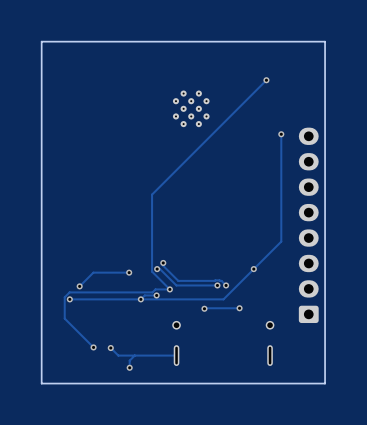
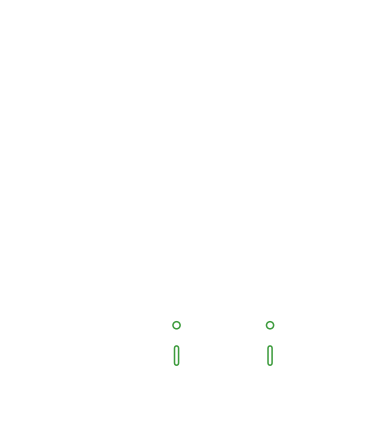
board edge: (325, 41) (41, 41) (41, 383) (325, 383) (325, 41) -> none
track: (266, 80) (152, 194) (152, 271) (169, 289) (155, 289) (152, 292) (69, 292) (64, 297) (64, 318) (93, 347) -> none
via: (266, 80) -> none
part: (191, 108) -> none
track: (281, 134) (281, 241) (223, 299) (69, 299) -> none
via: (281, 134) -> none
part: (308, 225) -> none
track: (163, 262) (163, 265) (178, 280) (219, 280) (226, 285) -> none
via: (163, 262) -> none
track: (157, 269) (160, 269) (176, 285) (217, 285) -> none
via: (157, 269) -> none
via: (253, 269) -> none
track: (129, 272) (93, 272) (79, 286) -> none
via: (129, 272) -> none
via: (217, 285) -> none
via: (226, 285) -> none
via: (79, 286) -> none
via: (169, 289) -> none
track: (156, 295) (144, 295) (140, 299) -> none
via: (156, 295) -> none
via: (69, 299) -> none
via: (140, 299) -> none
via: (204, 308) -> none
track: (239, 308) (204, 308) -> none
via: (239, 308) -> none
via: (93, 347) -> none
track: (110, 348) (118, 355) (176, 355) -> none
via: (110, 348) -> none
track: (134, 355) (129, 360) (129, 367) -> none
via: (129, 367) -> none

